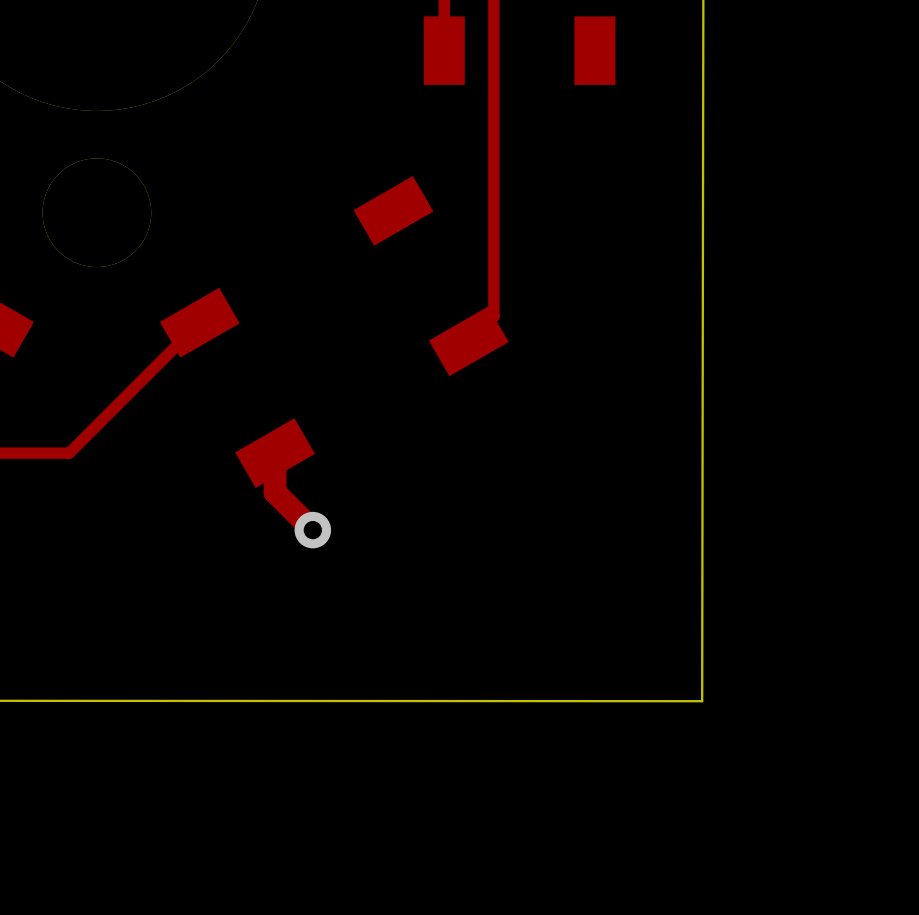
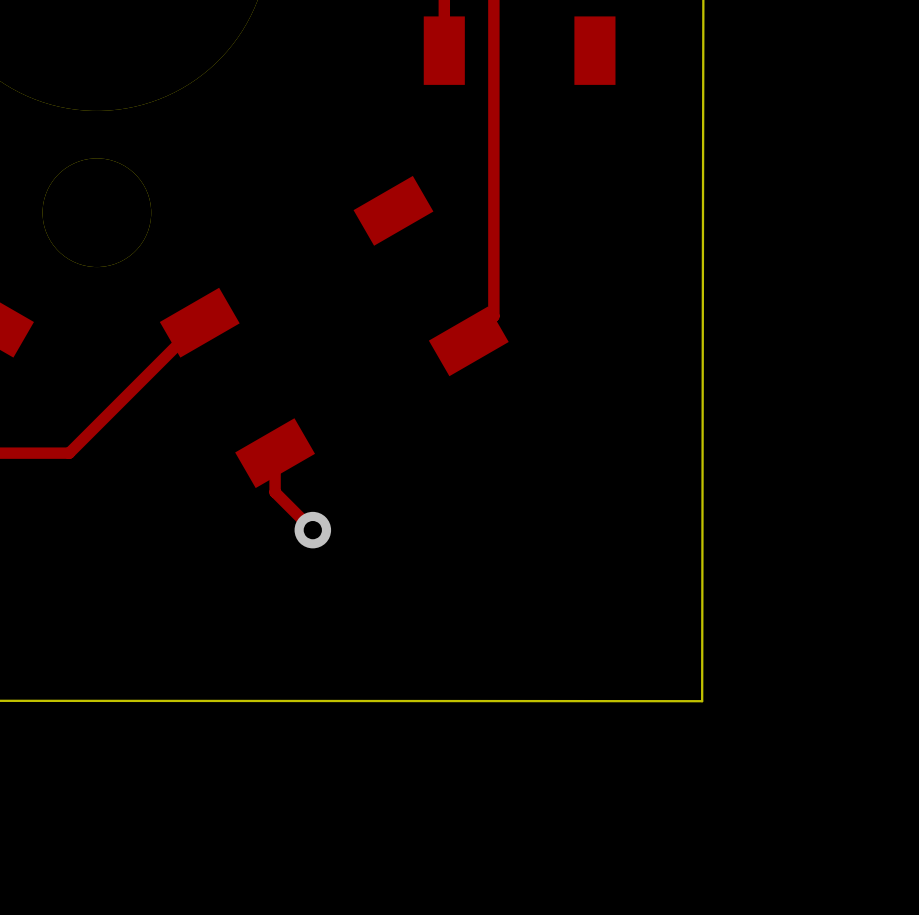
top track width: thick (275, 453) (275, 492) (312, 530) -> thin (275, 453) (275, 492) (312, 530)

